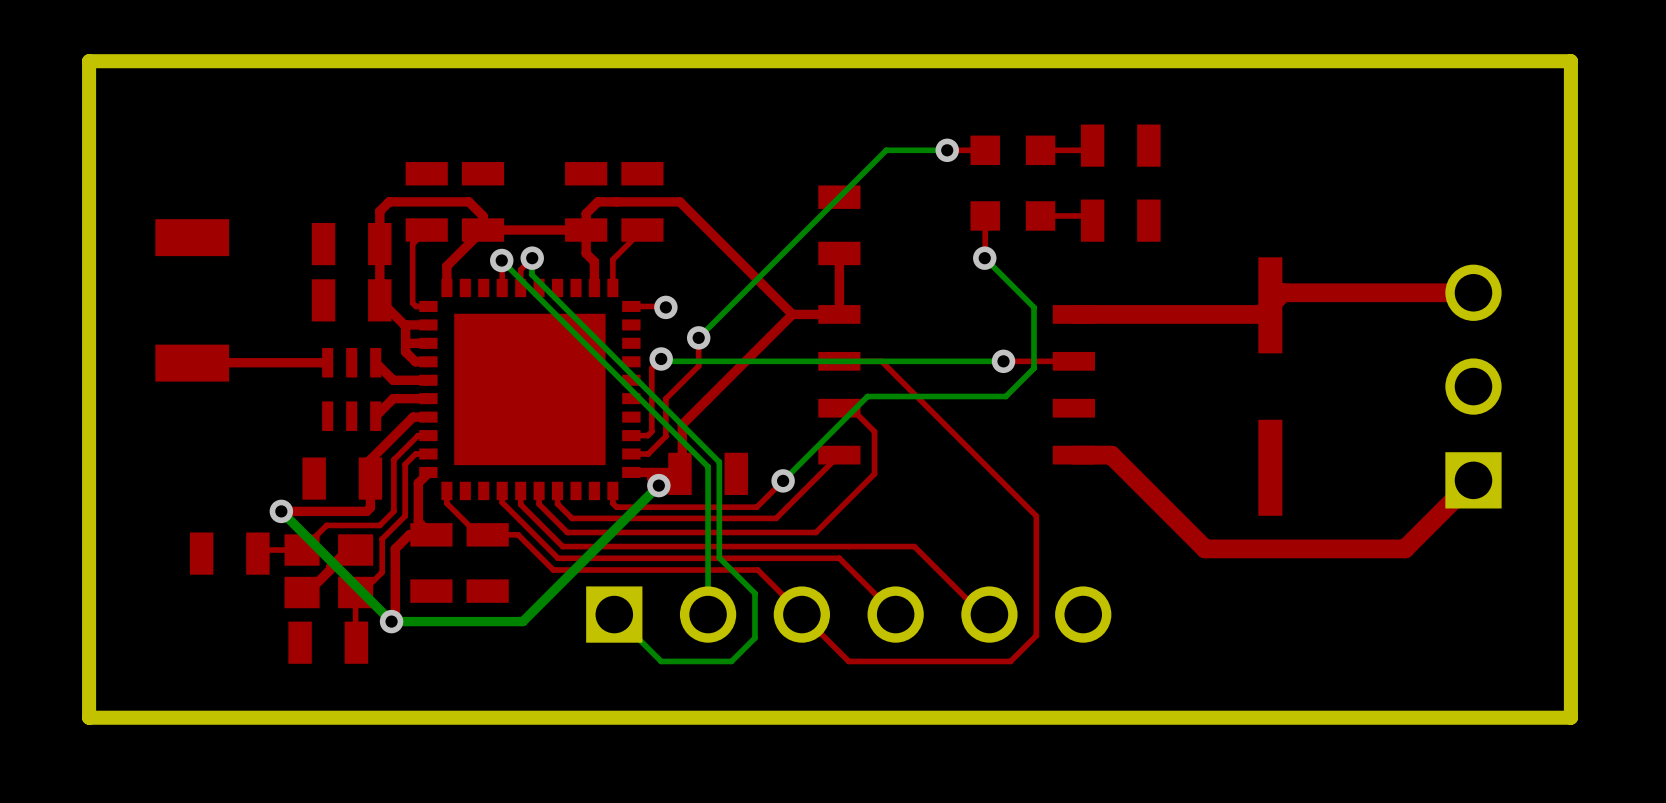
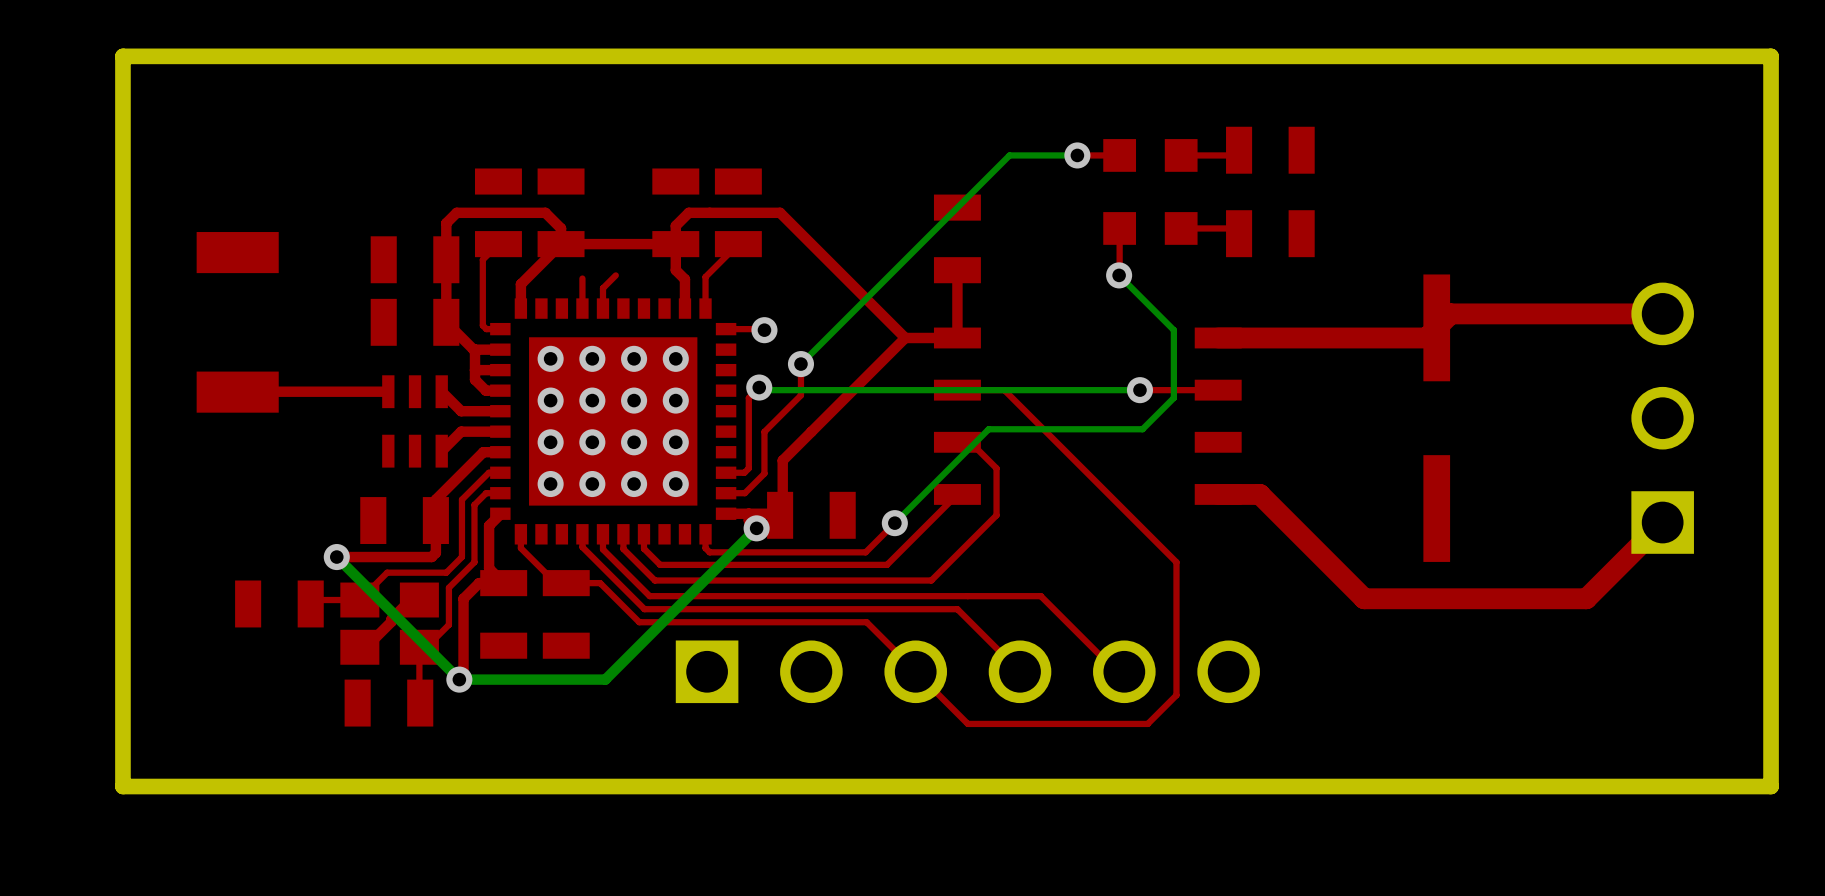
bottom track: (531, 258) (531, 274) (719, 462) (719, 557) (754, 593) (754, 638) (731, 661) (661, 661) (614, 614) -> none
via: (532, 258) -> none
bottom track: (501, 260) (708, 466) (708, 614) -> none
via: (501, 260) -> none
via: none -> (550, 358)
via: none -> (592, 358)
via: none -> (634, 358)
via: none -> (675, 358)
via: none -> (550, 400)
via: none -> (592, 400)
via: none -> (634, 400)
via: none -> (675, 400)
via: none -> (550, 442)
via: none -> (592, 442)
via: none -> (634, 442)
via: none -> (675, 442)
via: none -> (550, 484)
via: none -> (592, 484)
via: none -> (634, 484)
via: none -> (675, 484)

